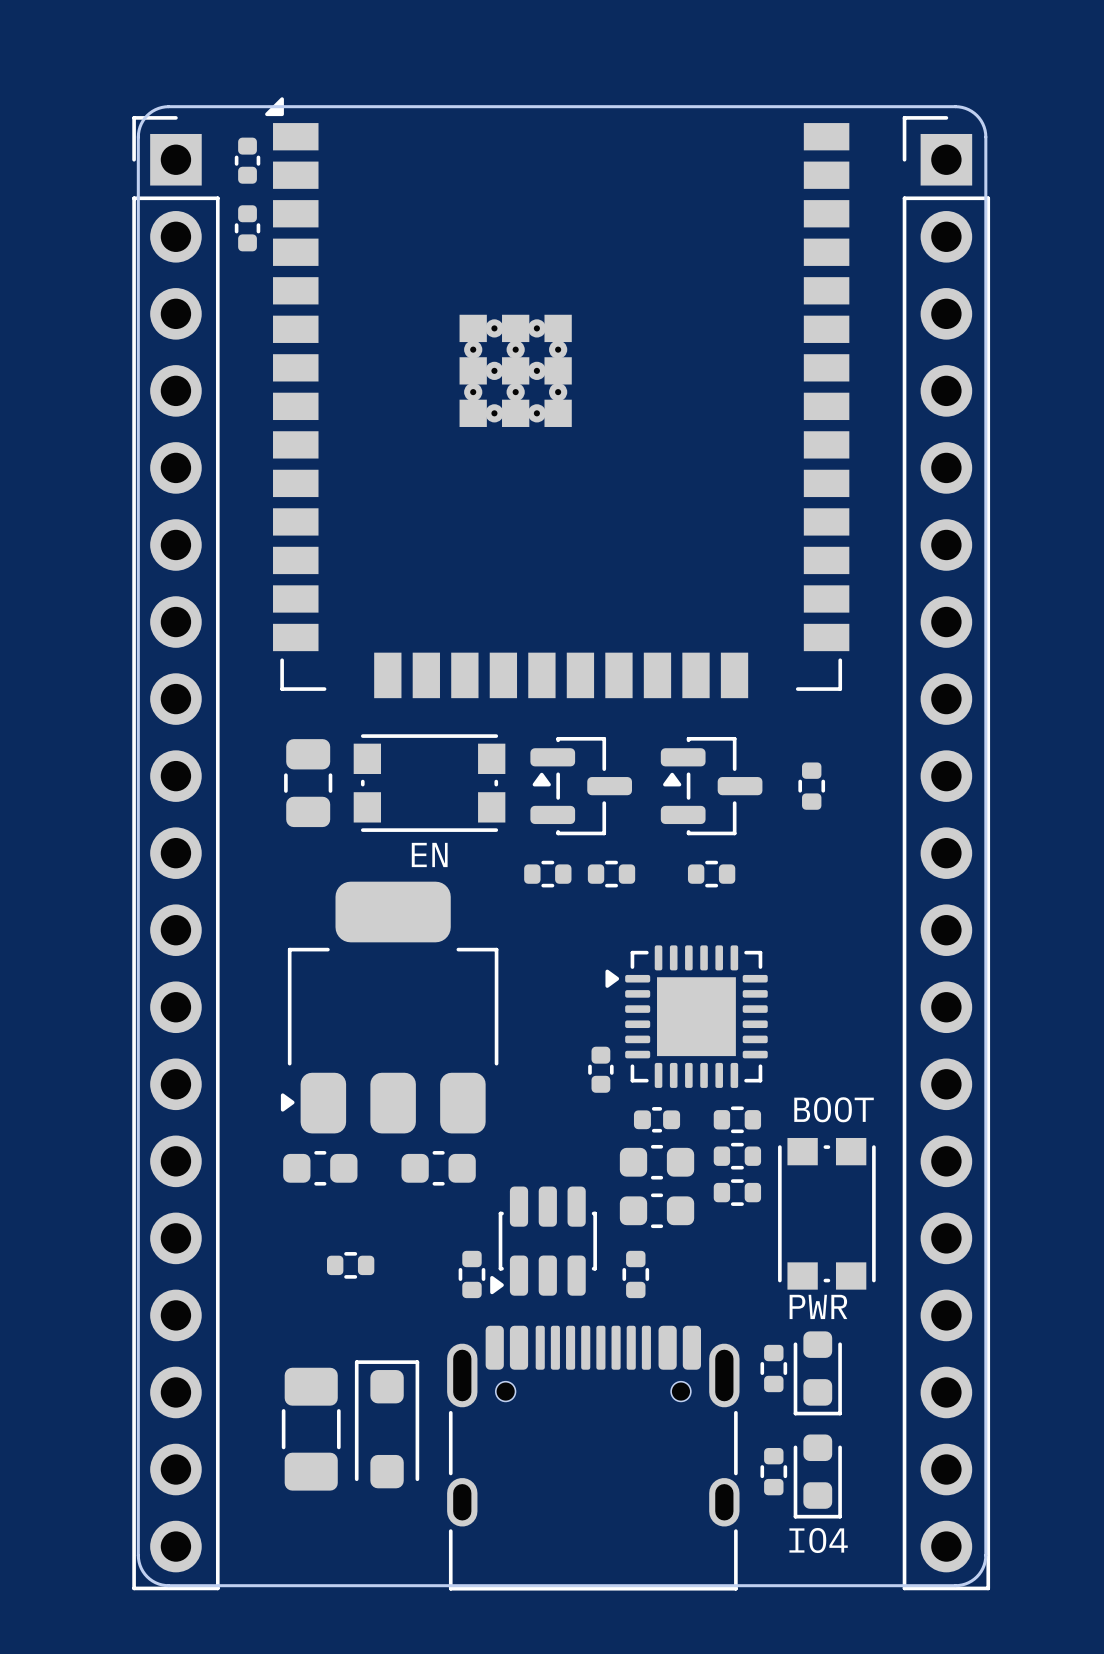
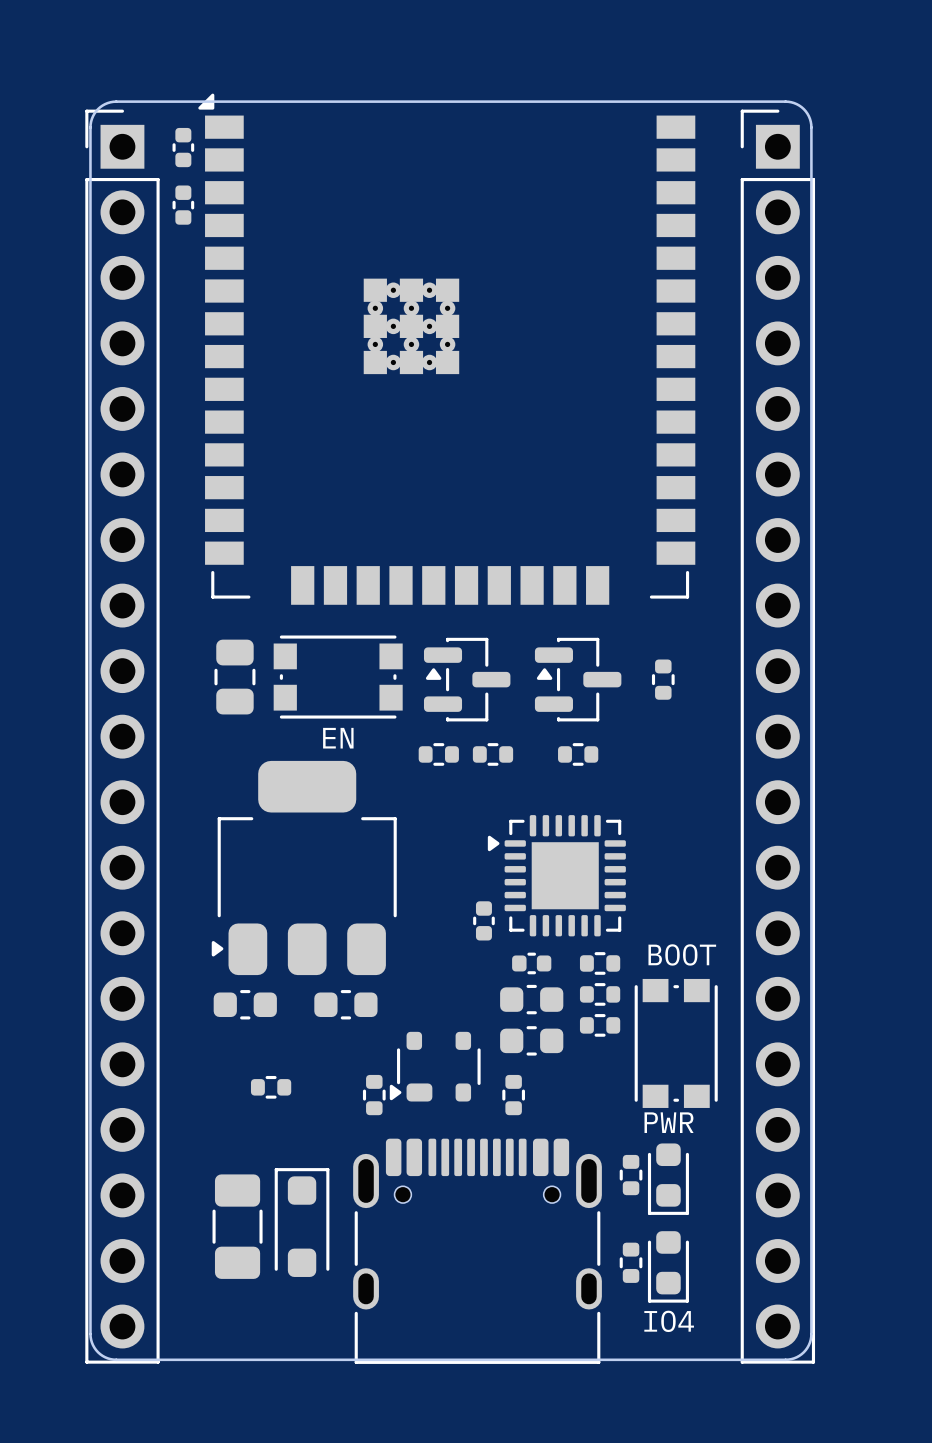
part footprint: [490, 1186, 597, 1296] -> [389, 1031, 481, 1102]

